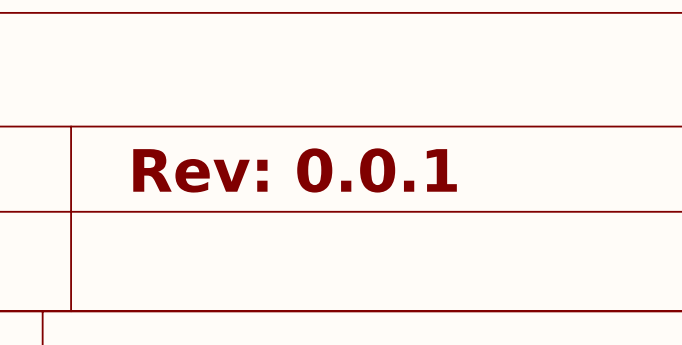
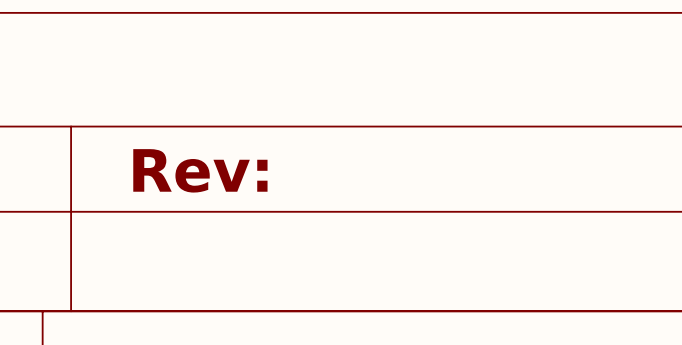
title block: Rev: 0.0.1 (295, 170) -> Rev: (200, 170)

